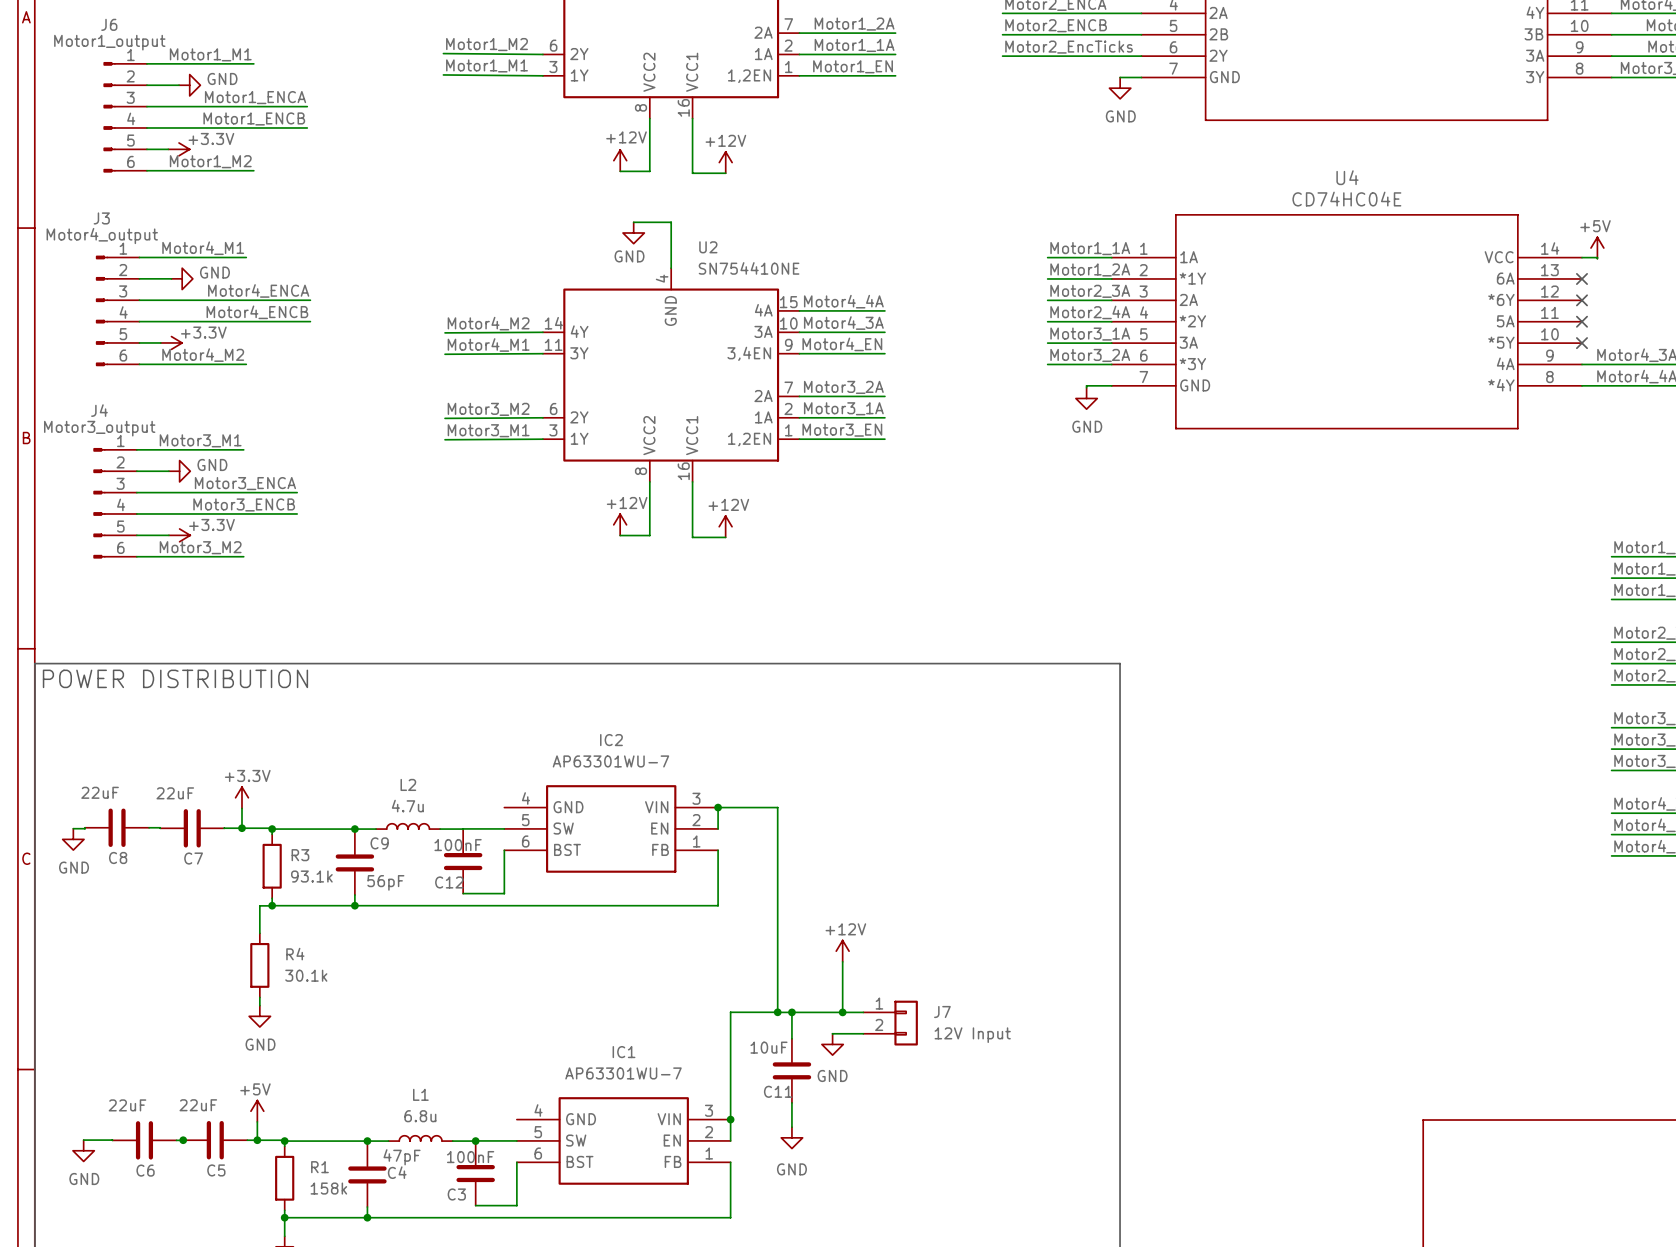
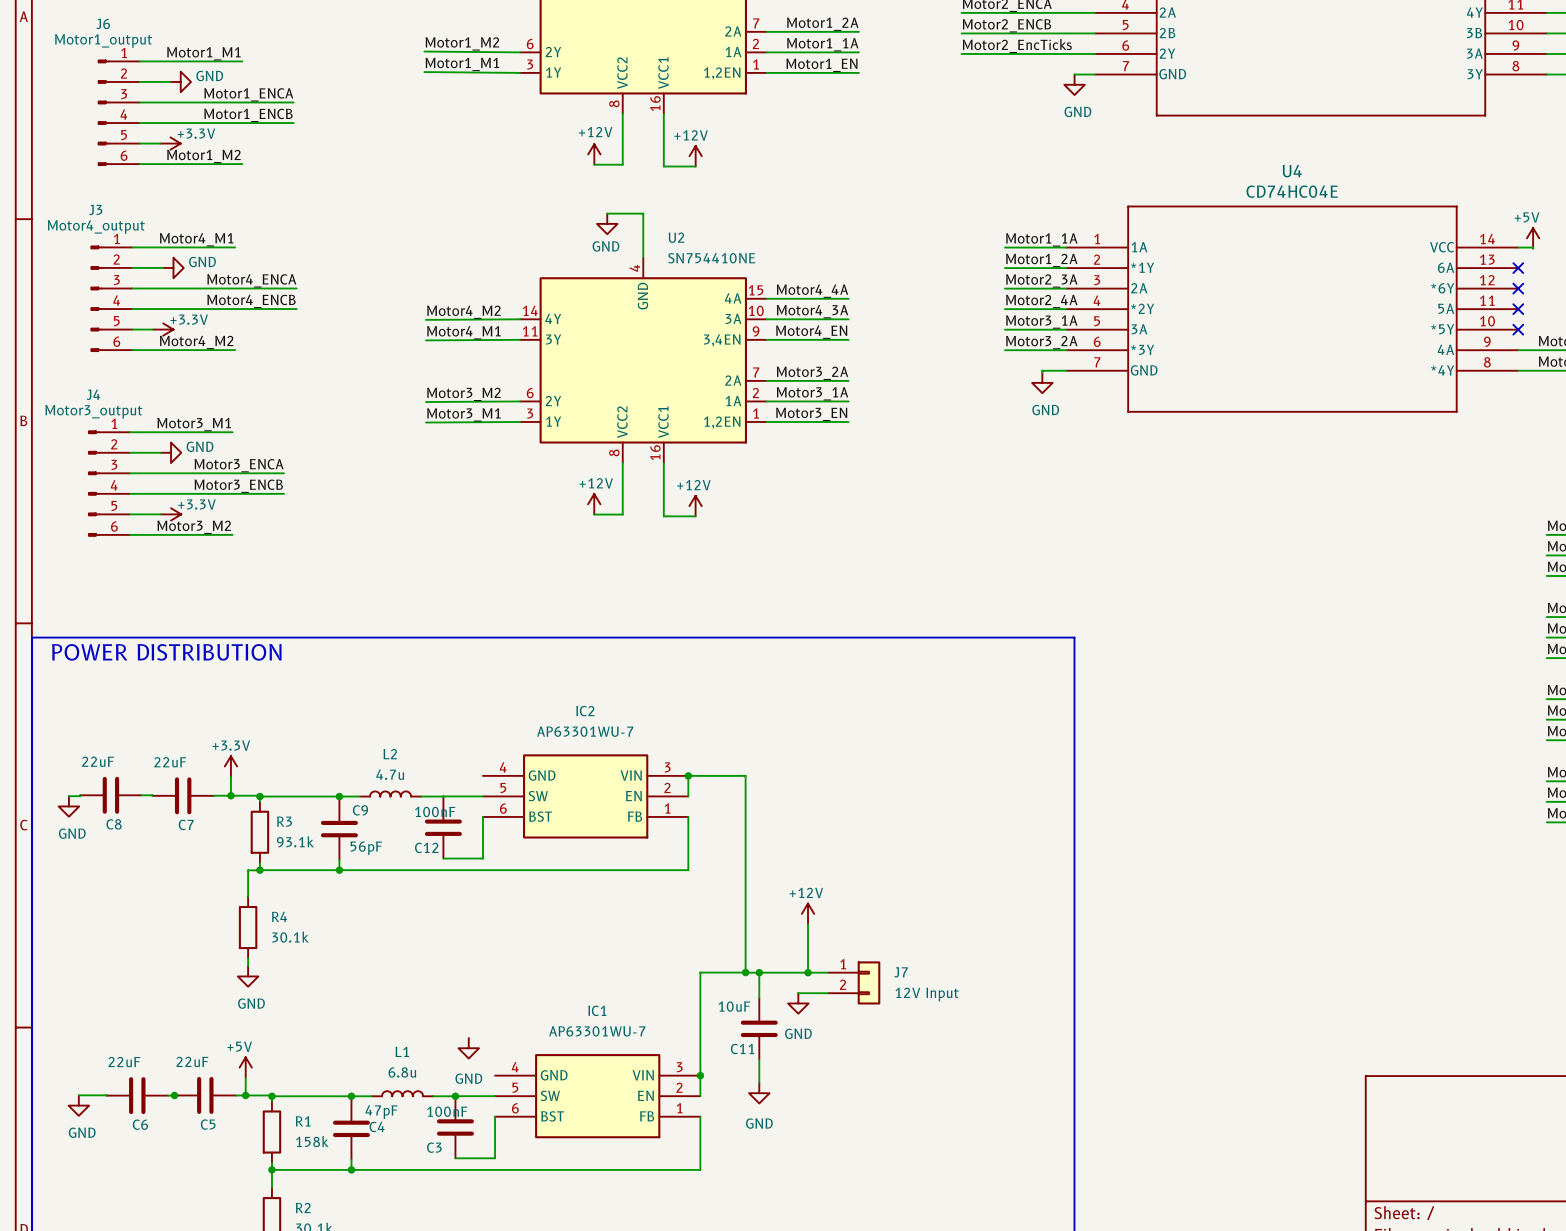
power symbol: none -> GND (468, 1048)

